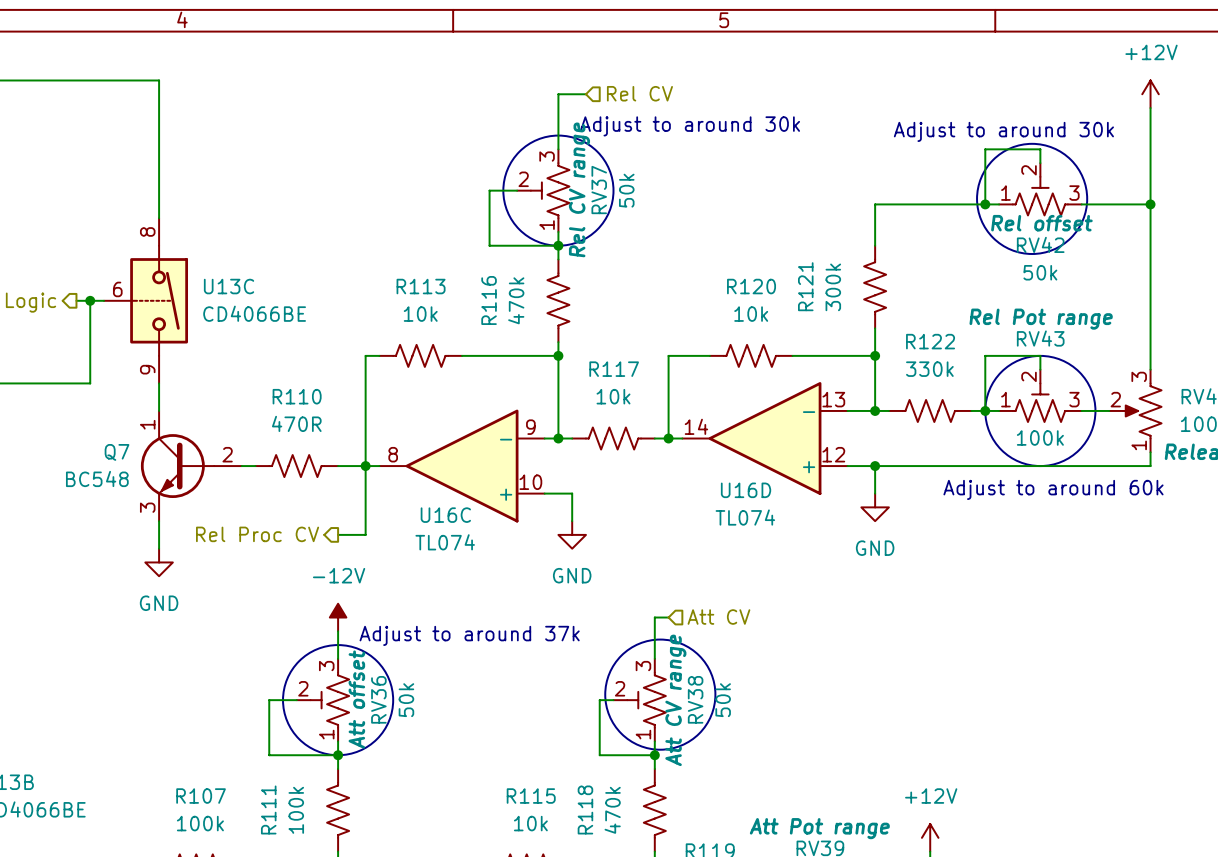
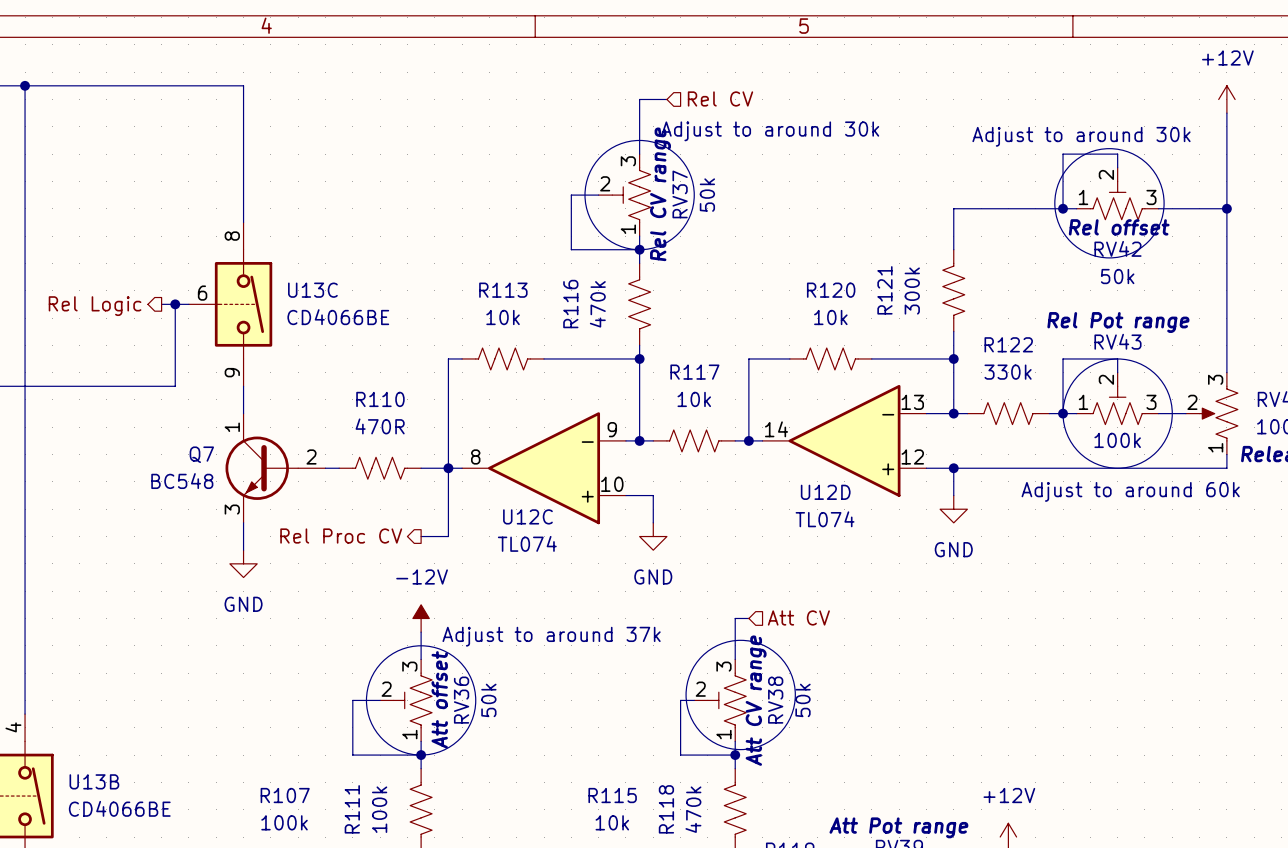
U16D name: U16D (746, 490) -> U12D (825, 492)
U16C name: U16C (445, 515) -> U12C (527, 516)

